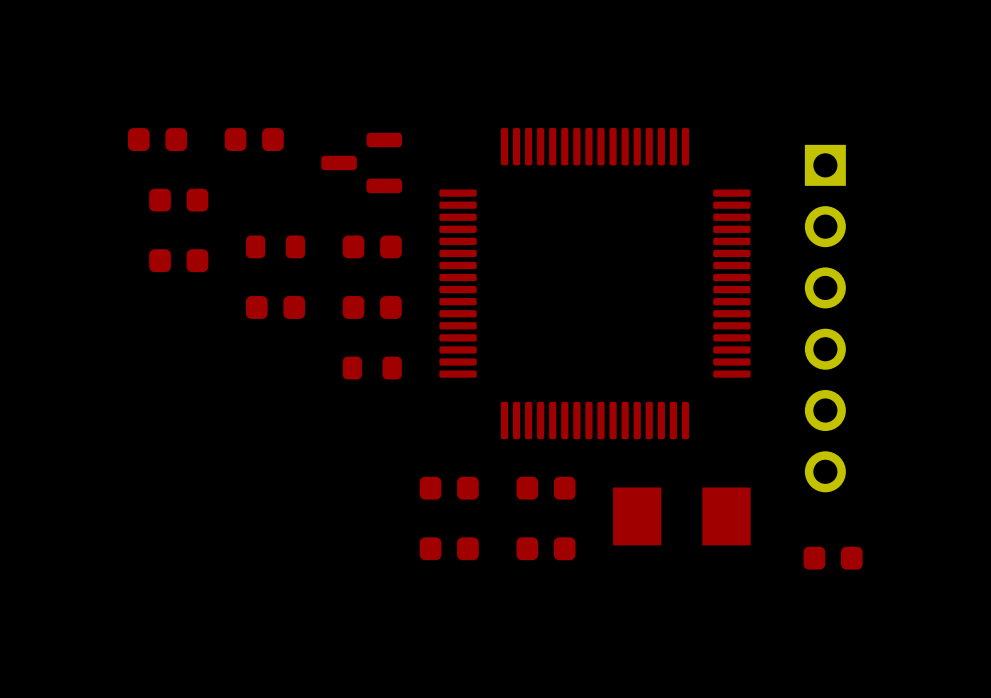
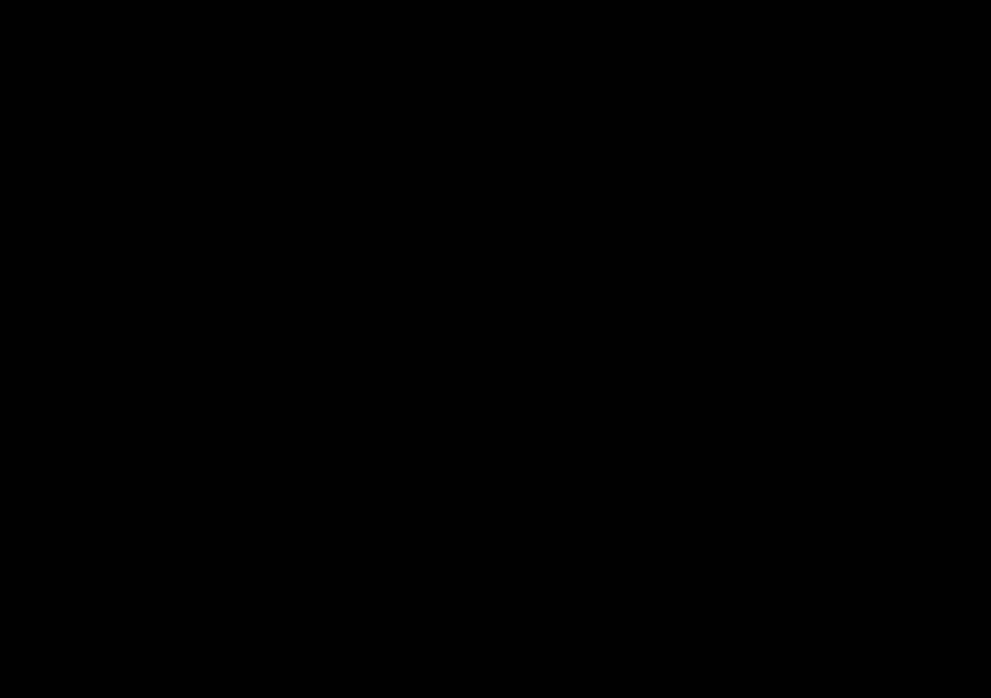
part: (157, 139) -> none
part: (254, 139) -> none
part: (361, 162) -> none
part: (178, 200) -> none
part: (275, 246) -> none
part: (372, 246) -> none
part: (178, 260) -> none
part: (594, 283) -> none
part: (275, 307) -> none
part: (372, 307) -> none
part: (825, 318) -> none
part: (372, 368) -> none
part: (449, 488) -> none
part: (545, 488) -> none
part: (681, 516) -> none
part: (449, 548) -> none
part: (545, 548) -> none
part: (833, 558) -> none

